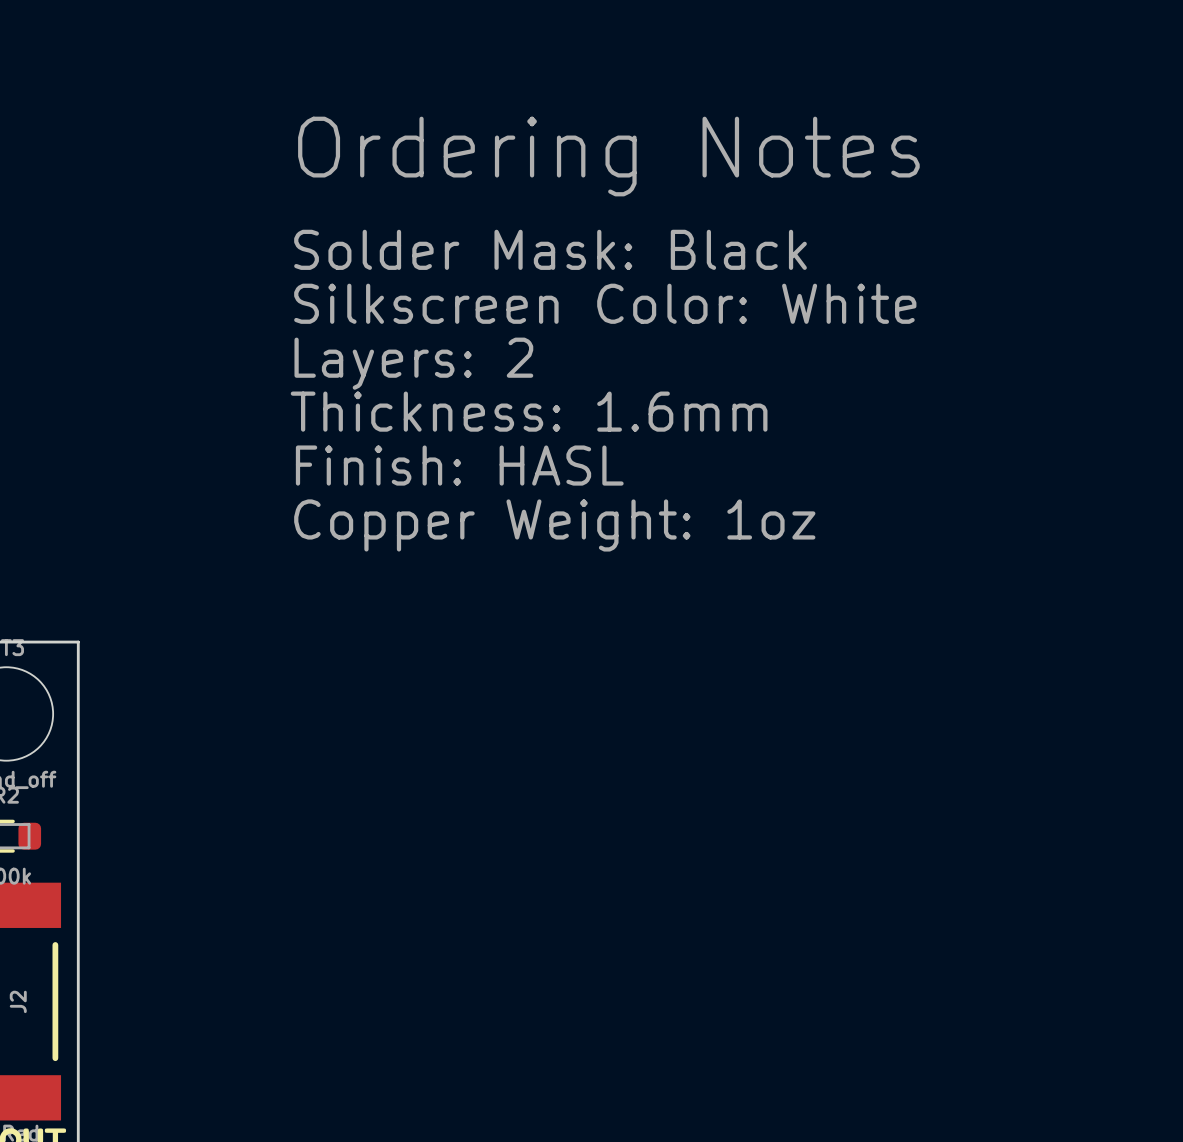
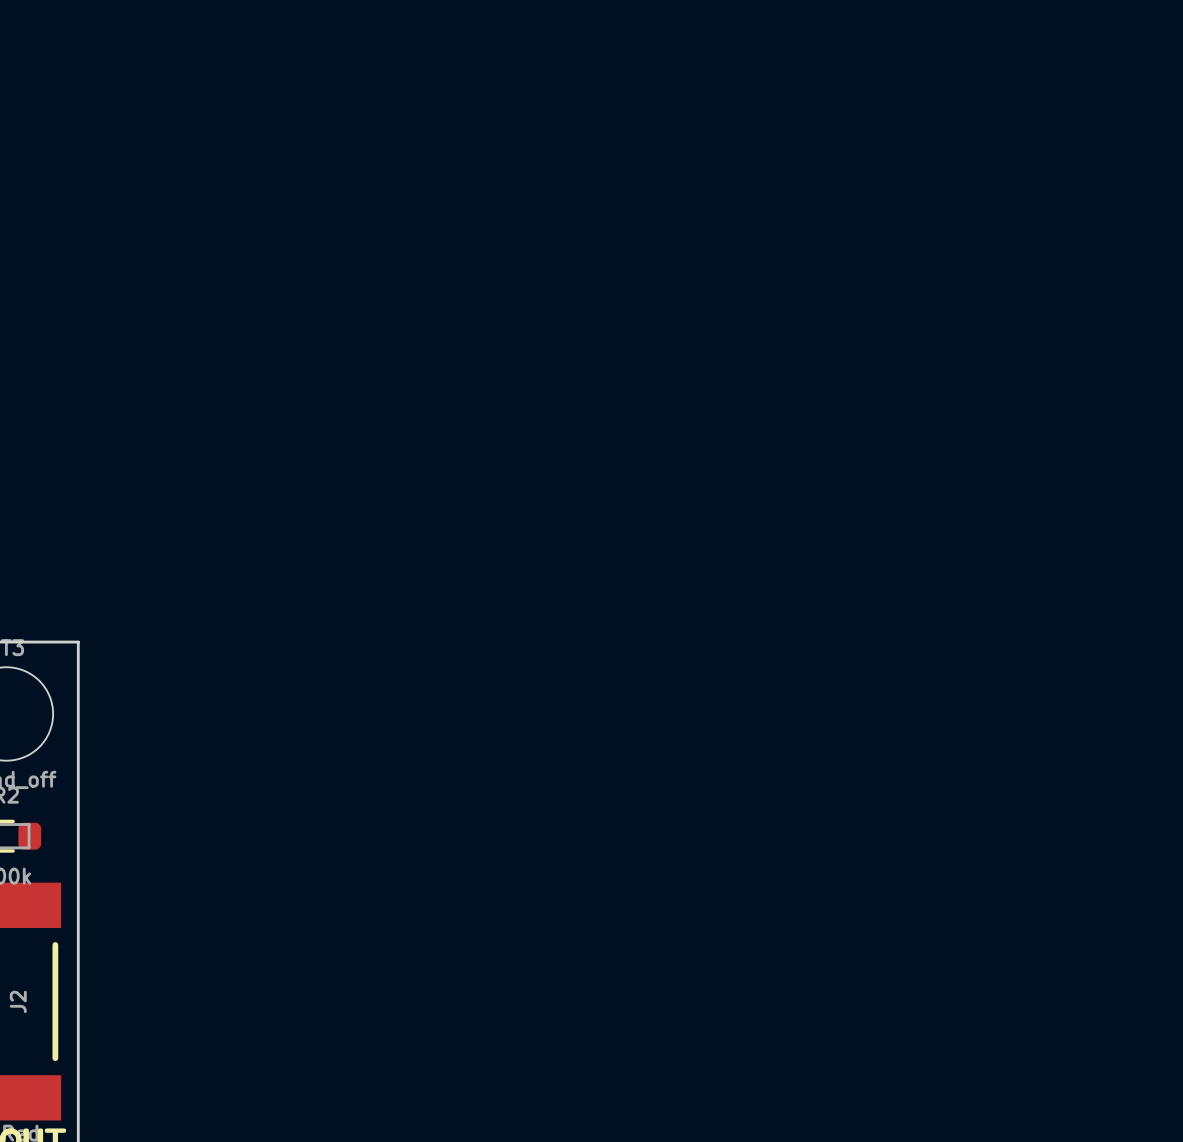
text: Ordering Notes (608, 156) -> none
text: Solder Mask: Black (550, 249) -> none
text: Silkscreen Color: White (605, 303) -> none
text: Layers: 2 (413, 363) -> none
text: Thickness: 1.6mm (529, 411) -> none
text: Finish: HASL (459, 465) -> none
text: Copper Weight: 1oz (554, 525) -> none

